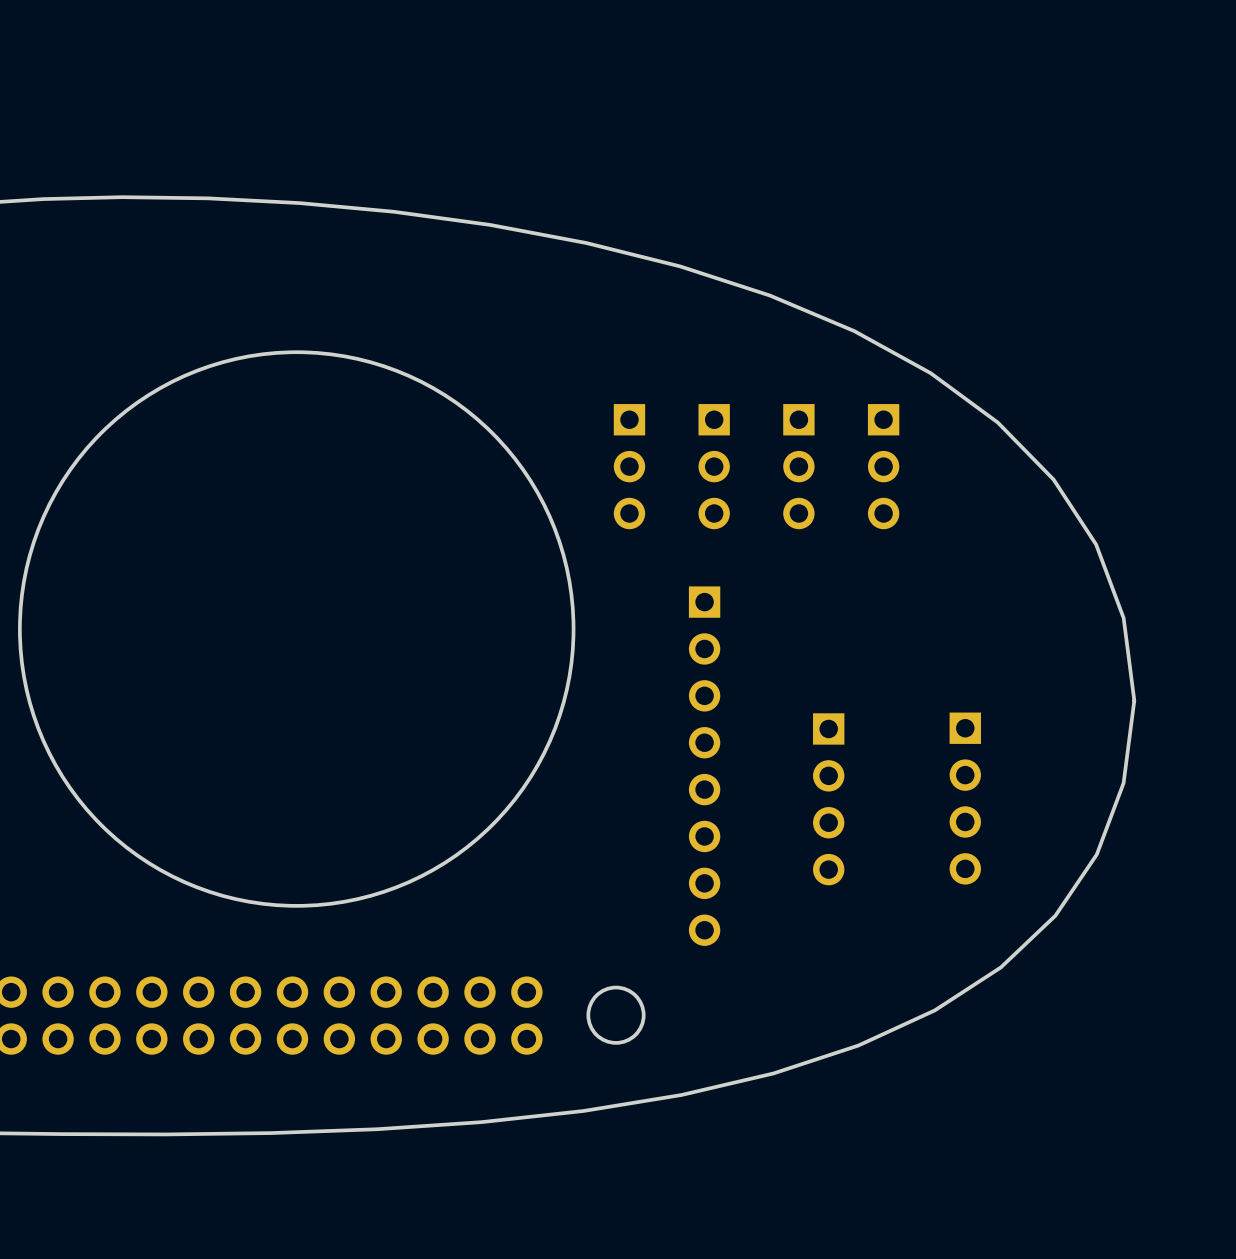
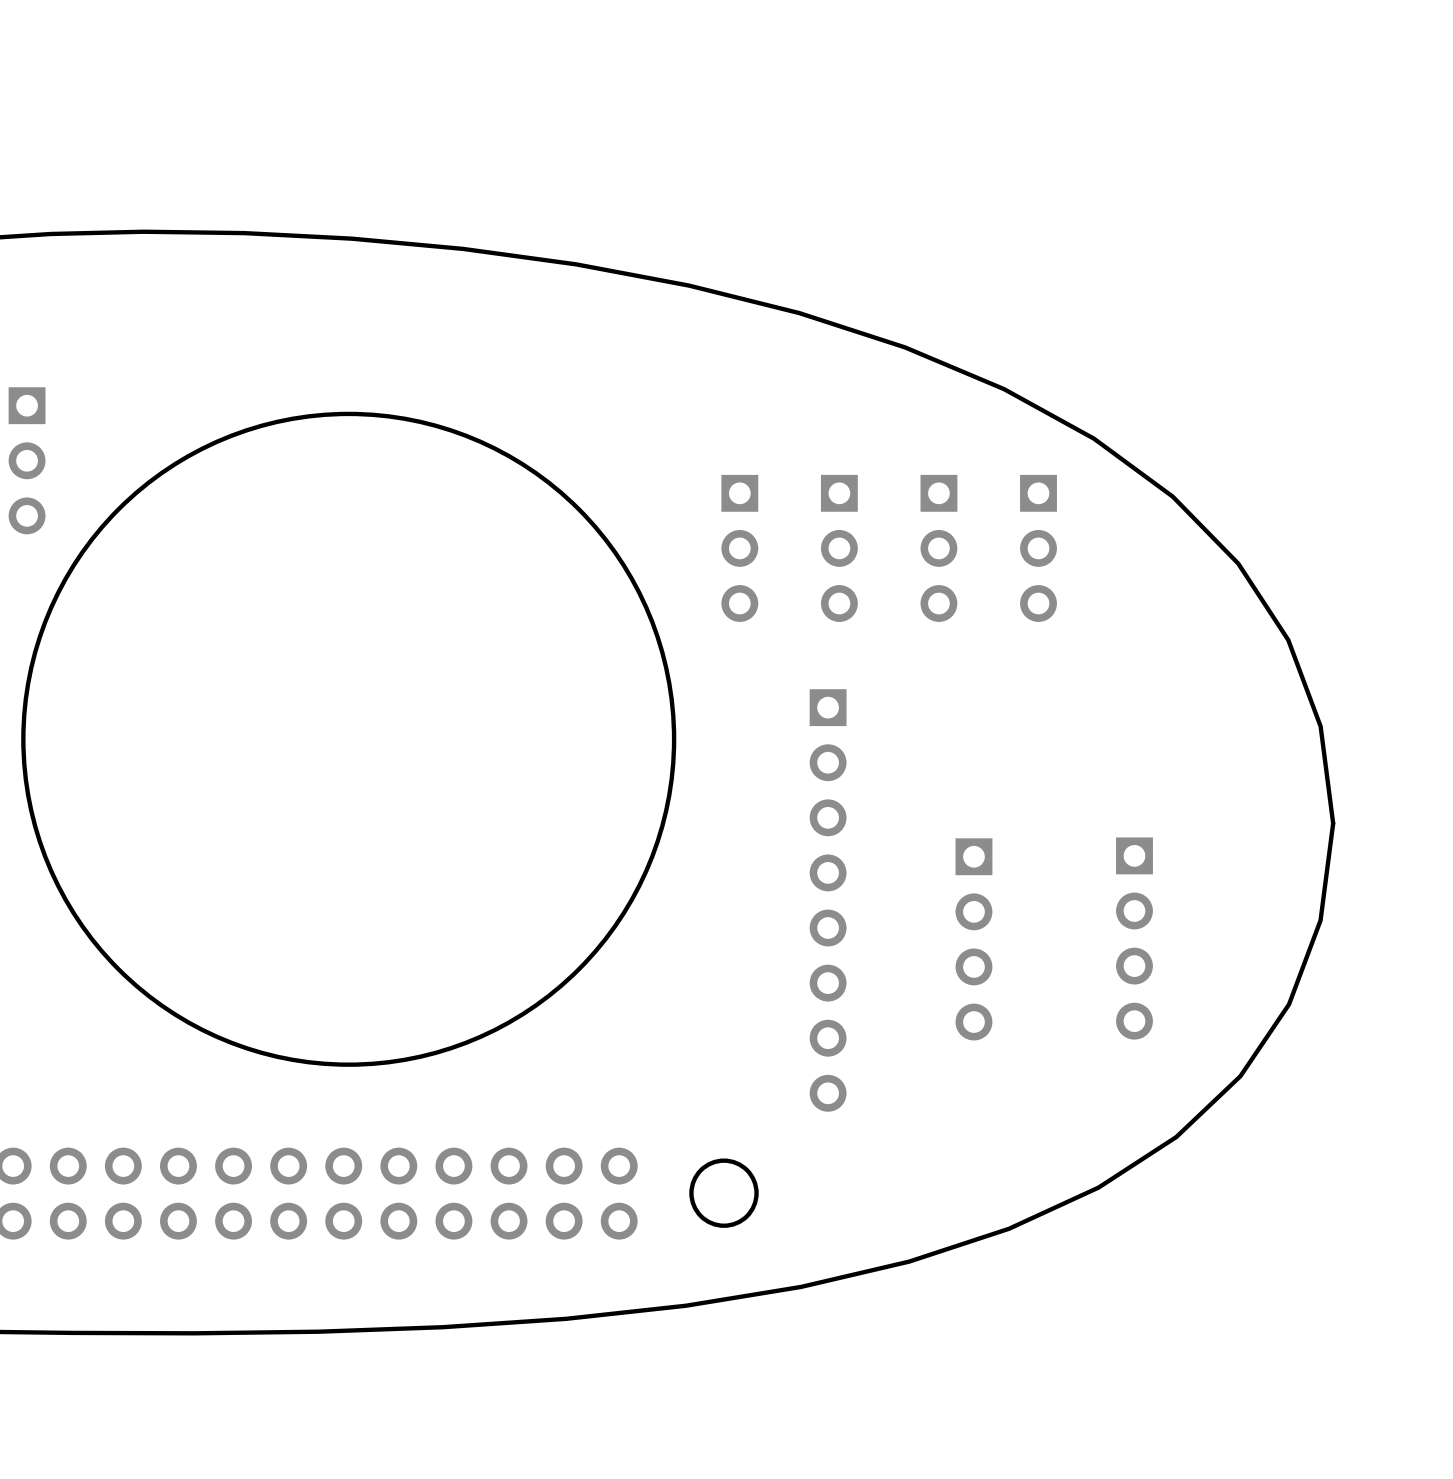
part: none -> (27, 460)

